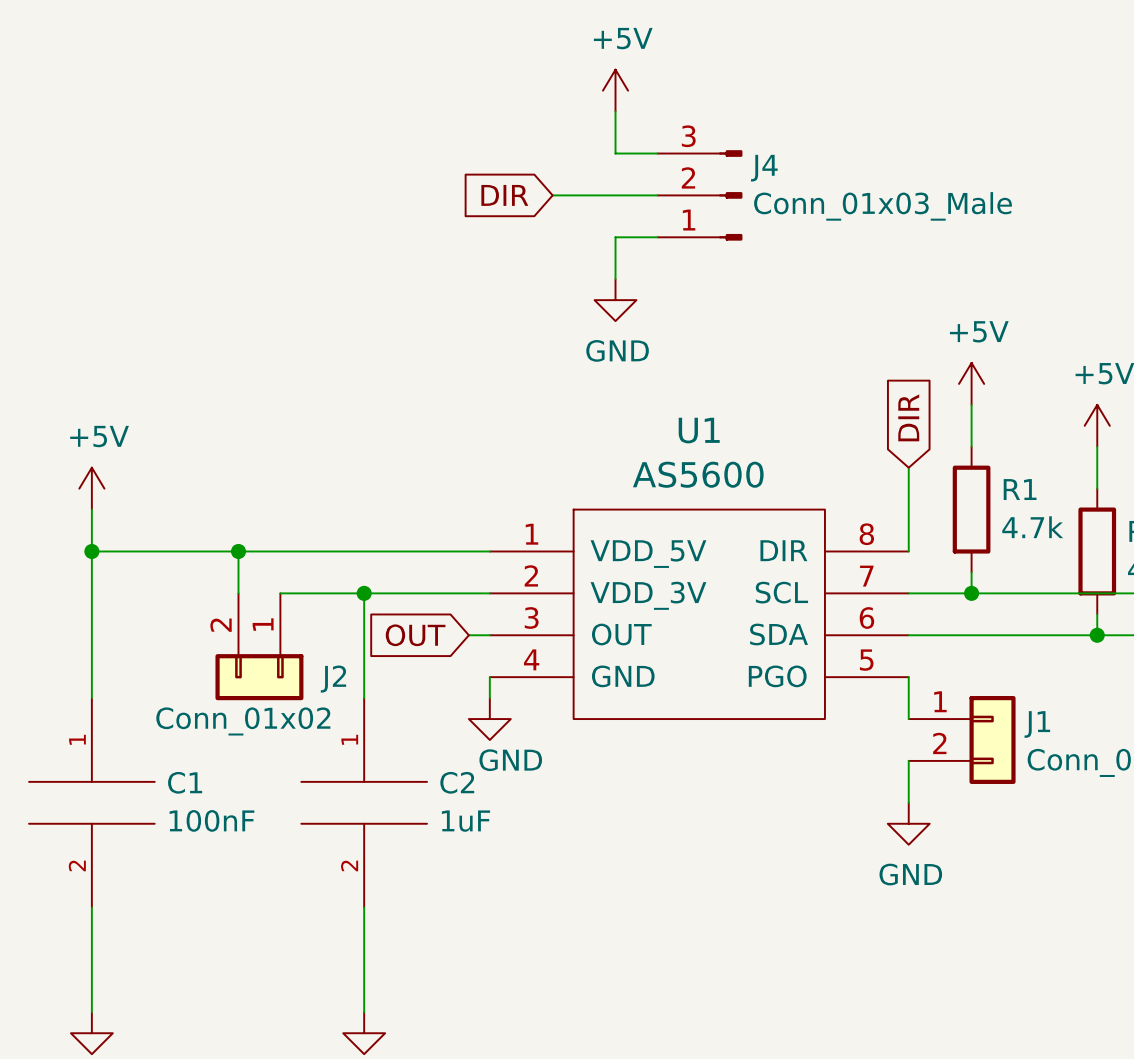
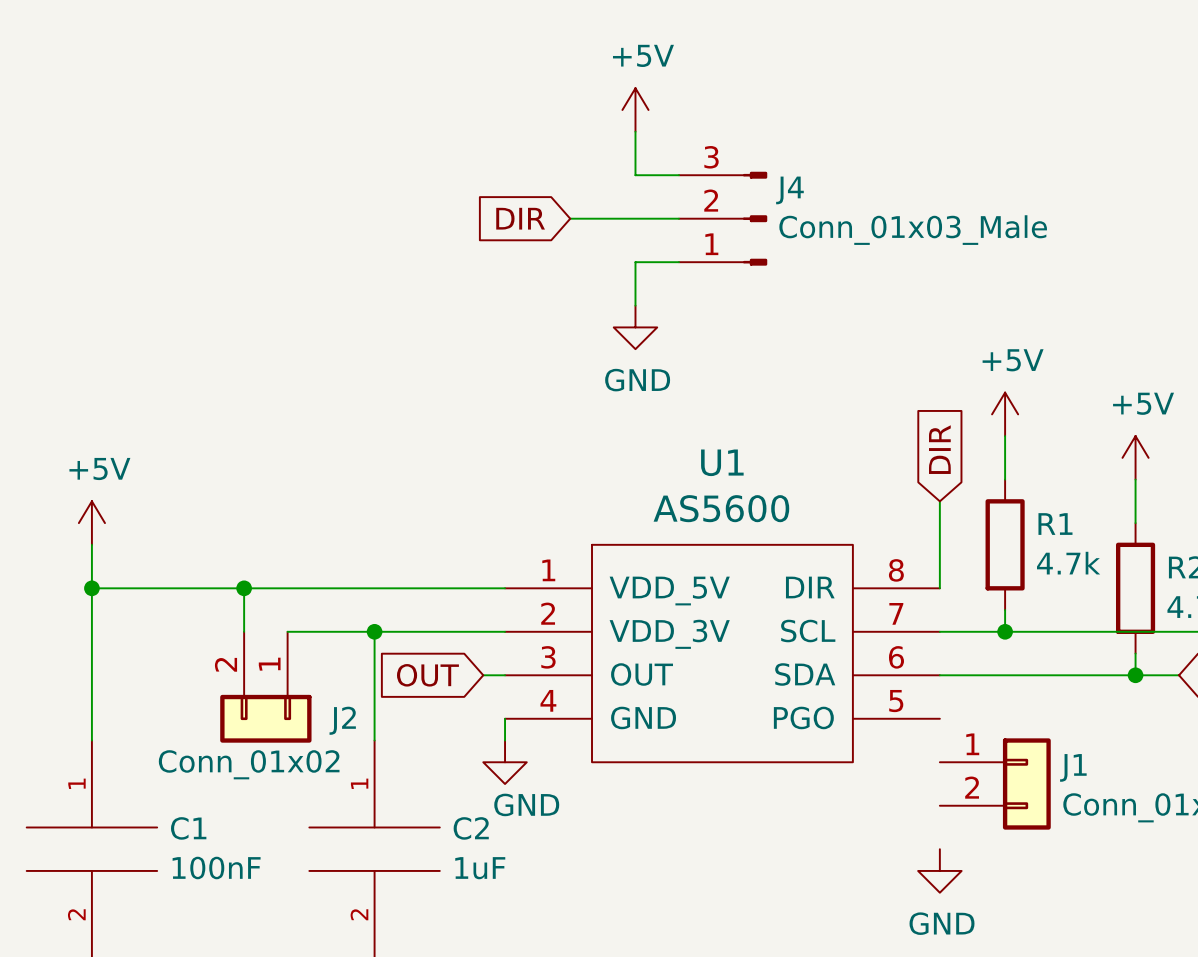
wire: (908, 677) (908, 719) -> none
wire: (908, 760) (908, 802) -> none

